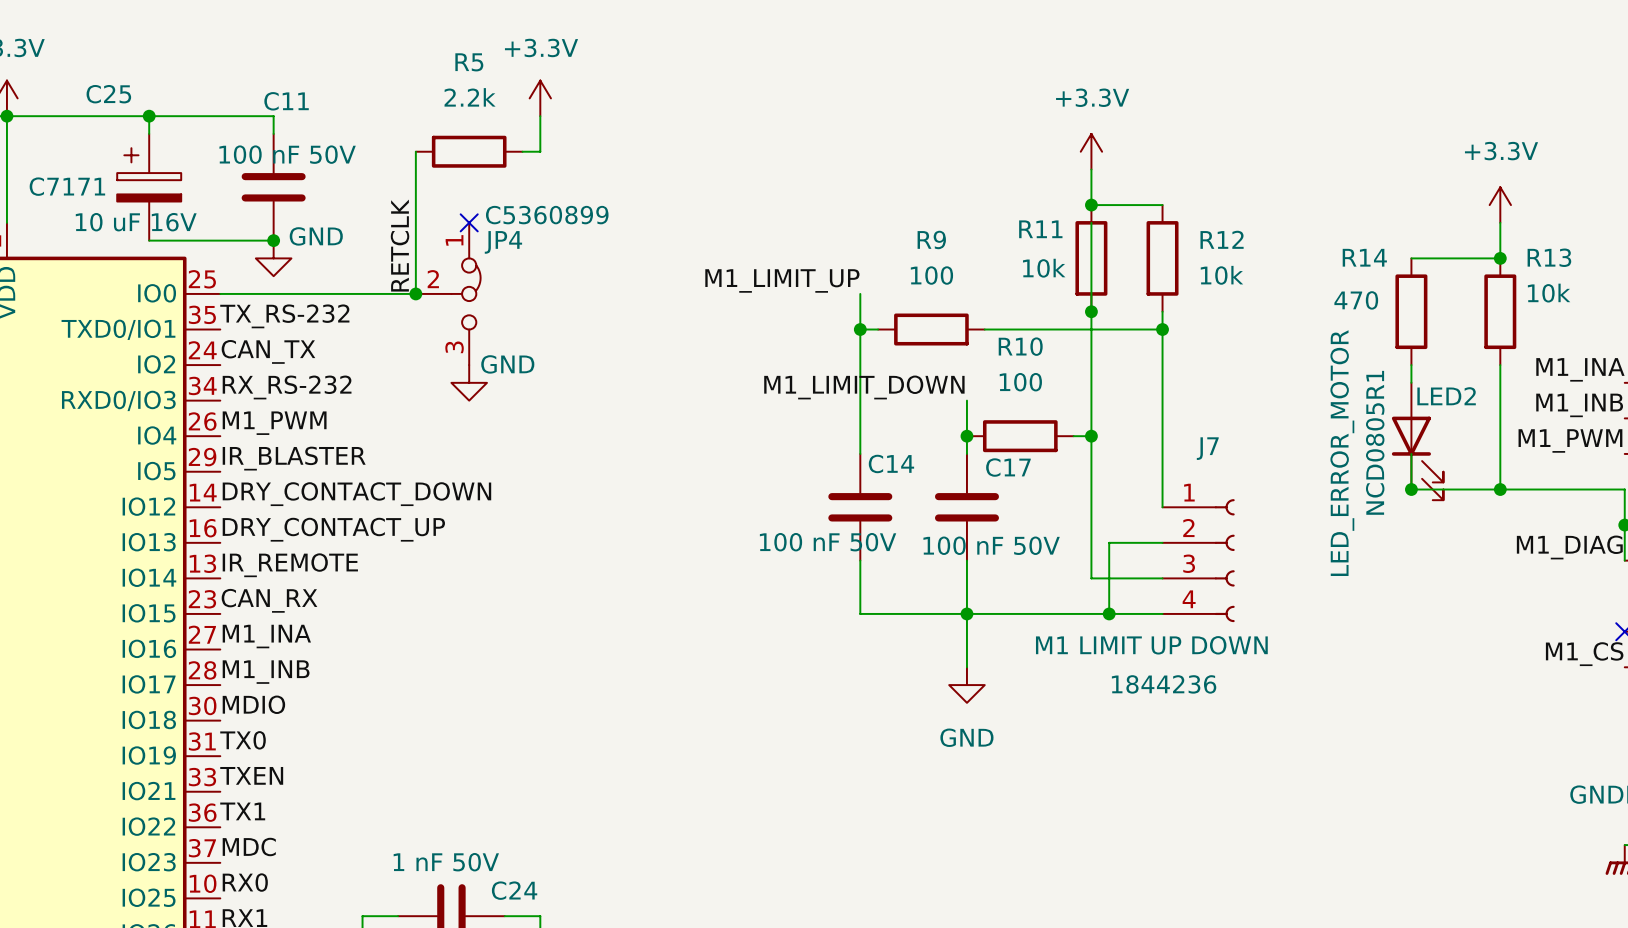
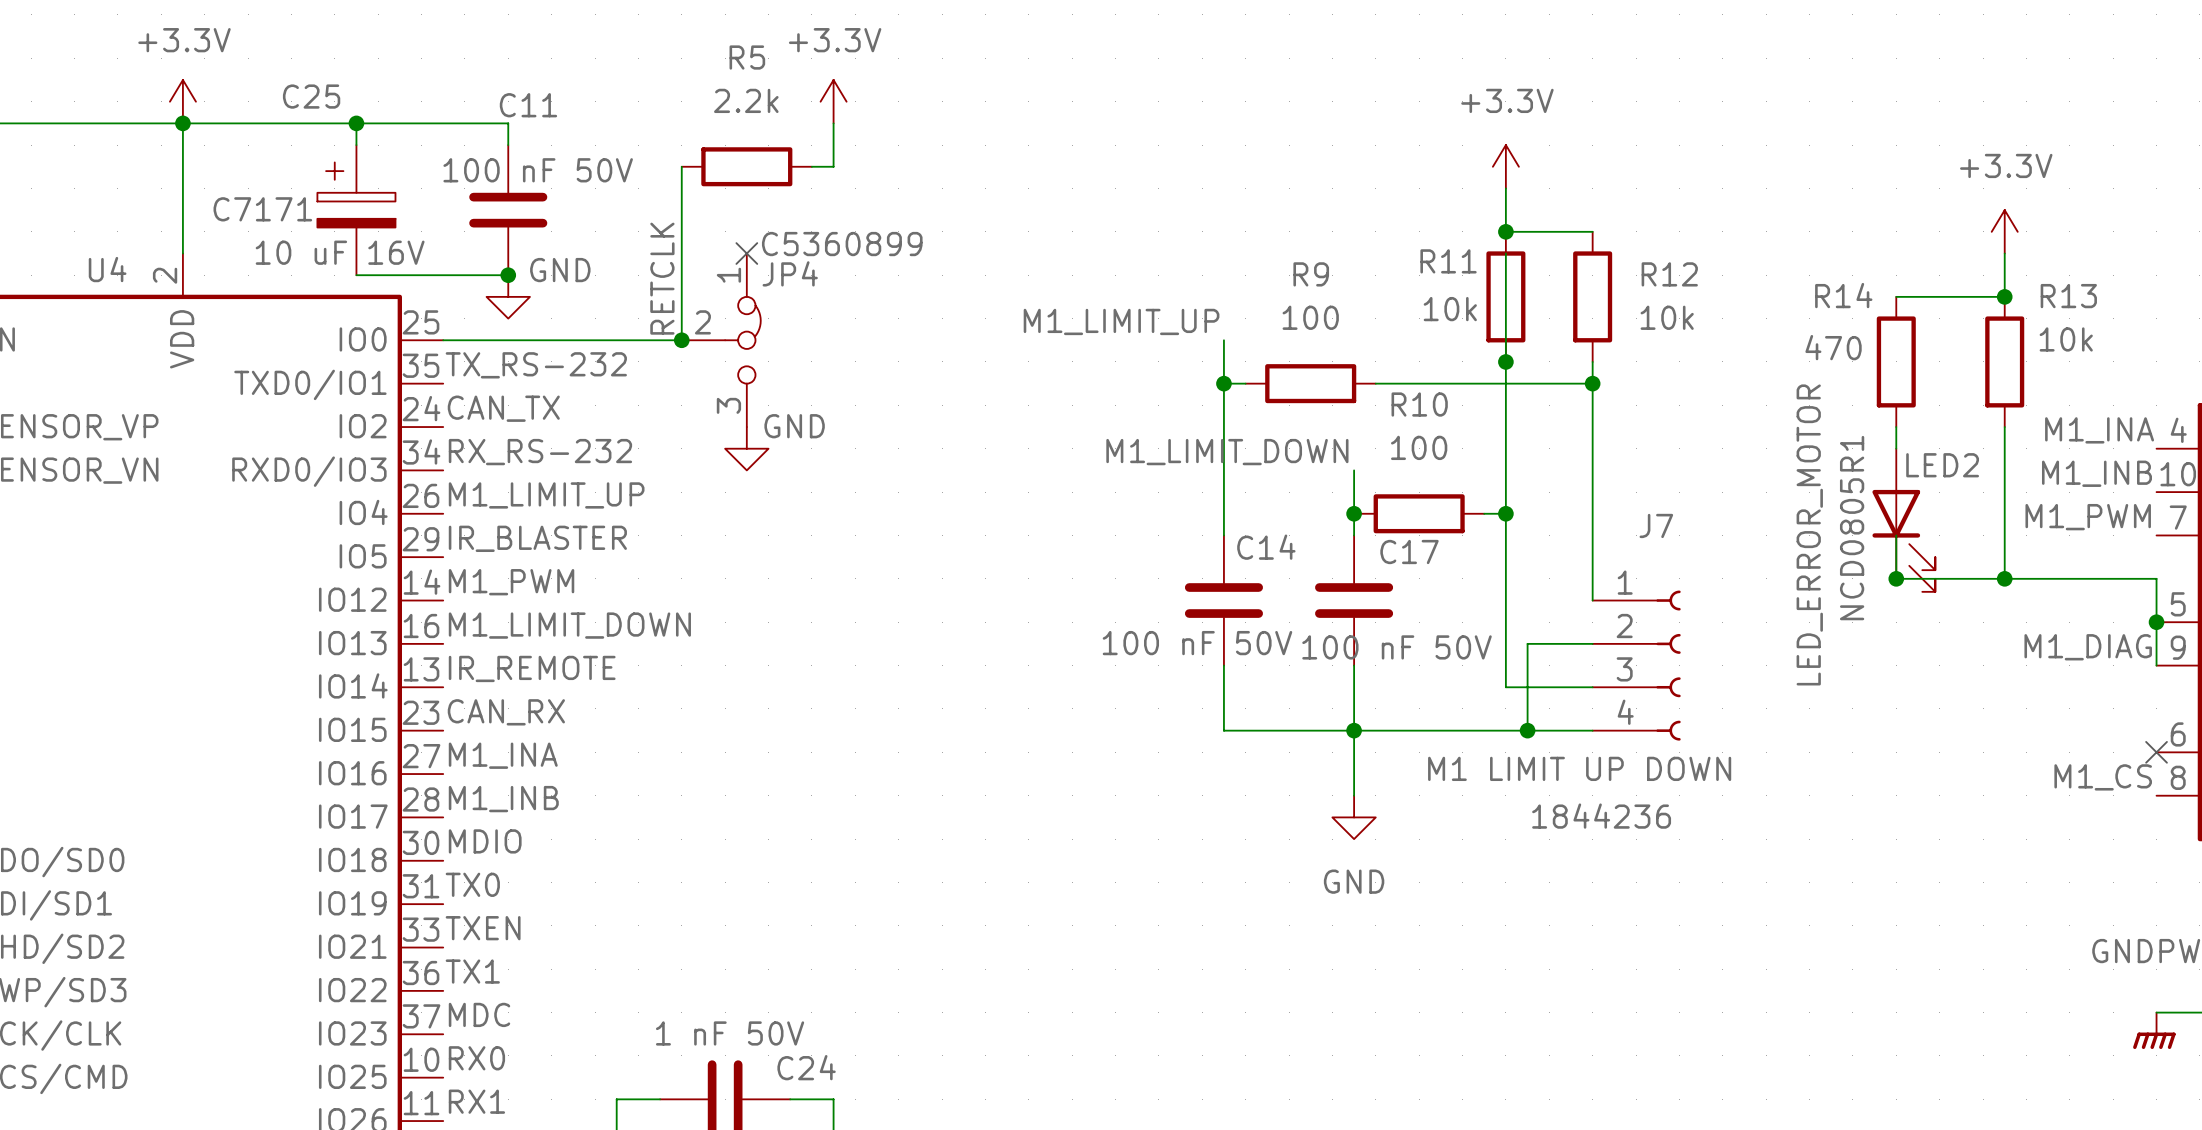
label: M1_PWM (274, 423) -> M1_LIMIT_UP (546, 495)
label: DRY_CONTACT_DOWN (356, 494) -> M1_PWM (511, 582)
label: DRY_CONTACT_UP (333, 529) -> M1_LIMIT_DOWN (569, 625)

